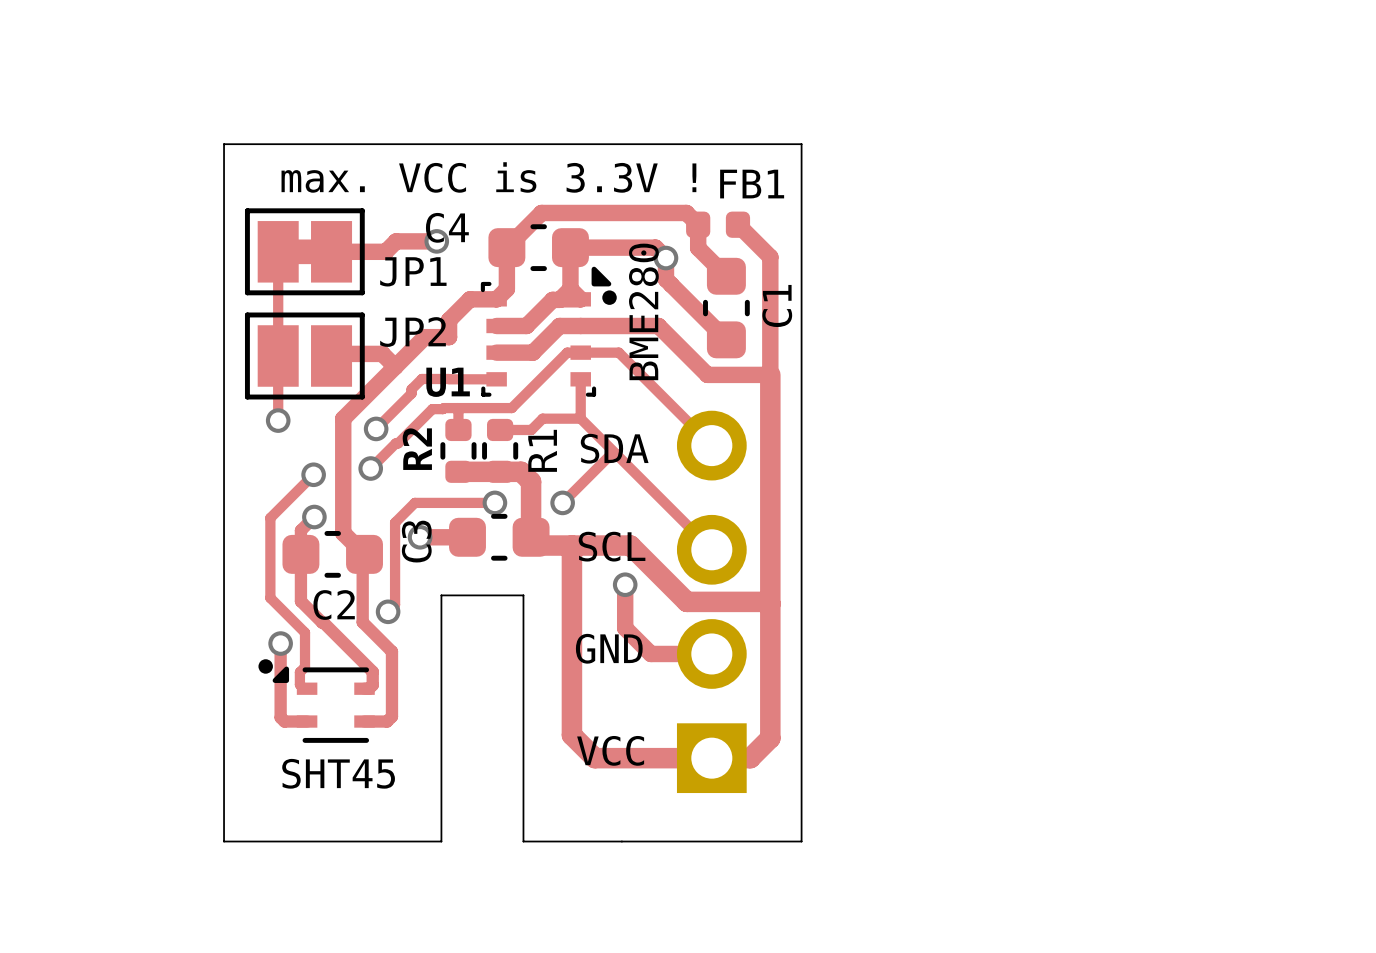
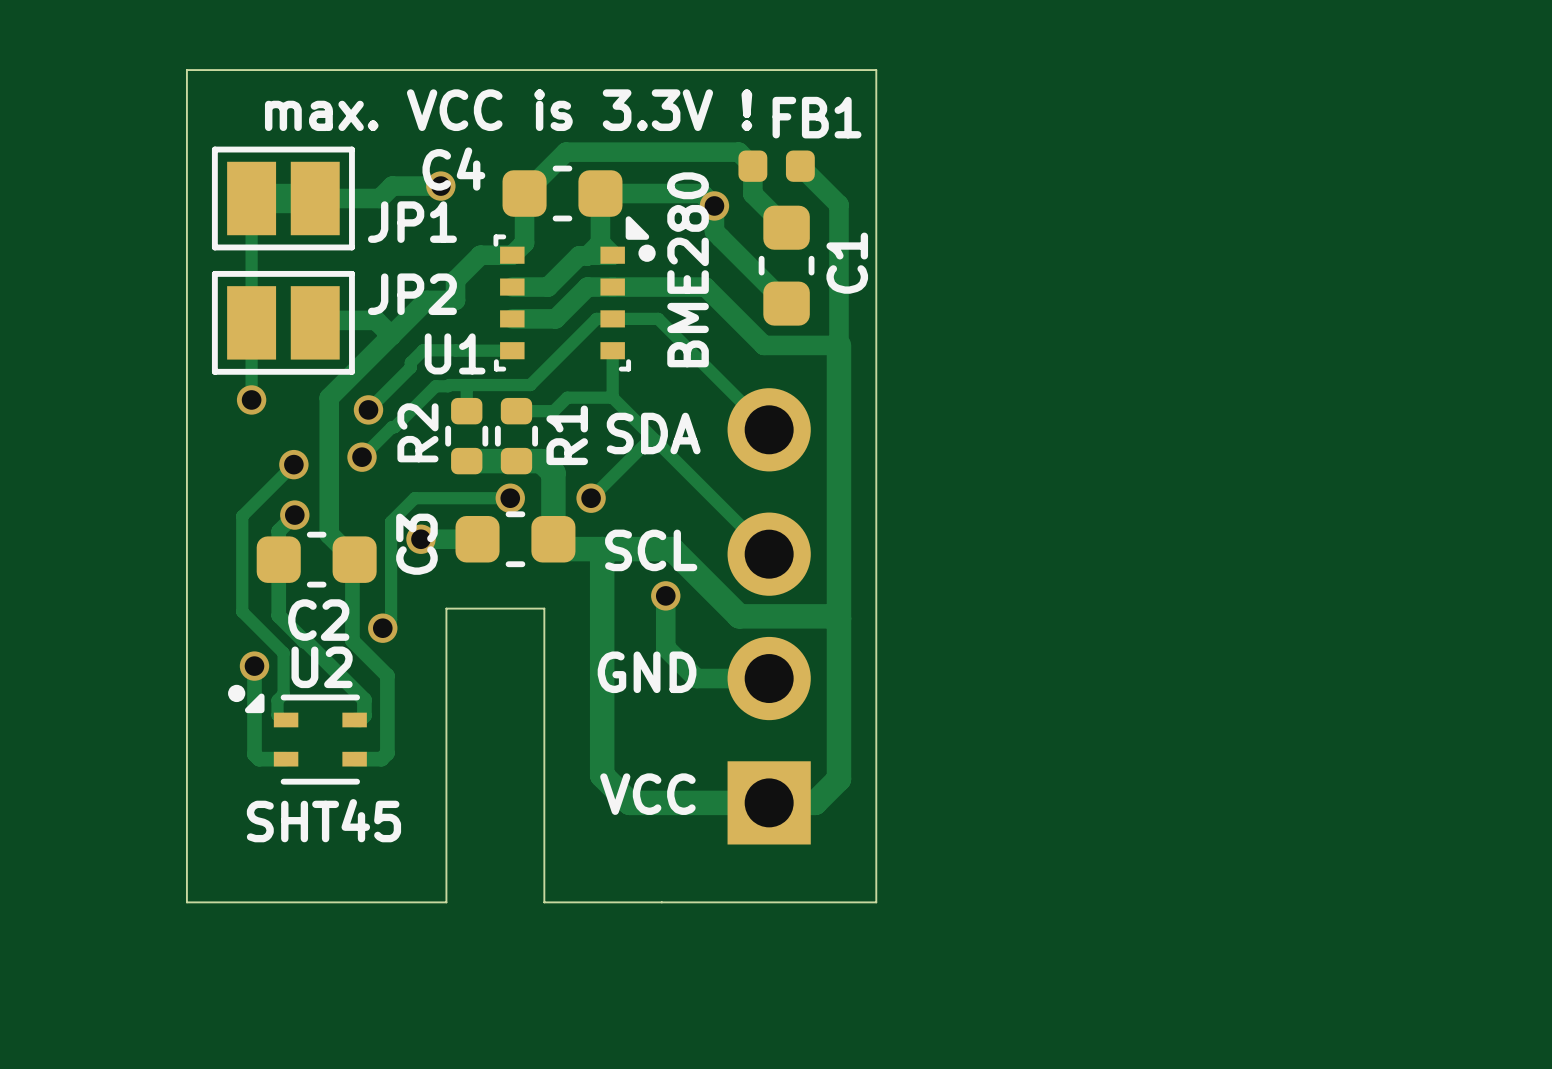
U2 name: none -> U2 (322, 667)

